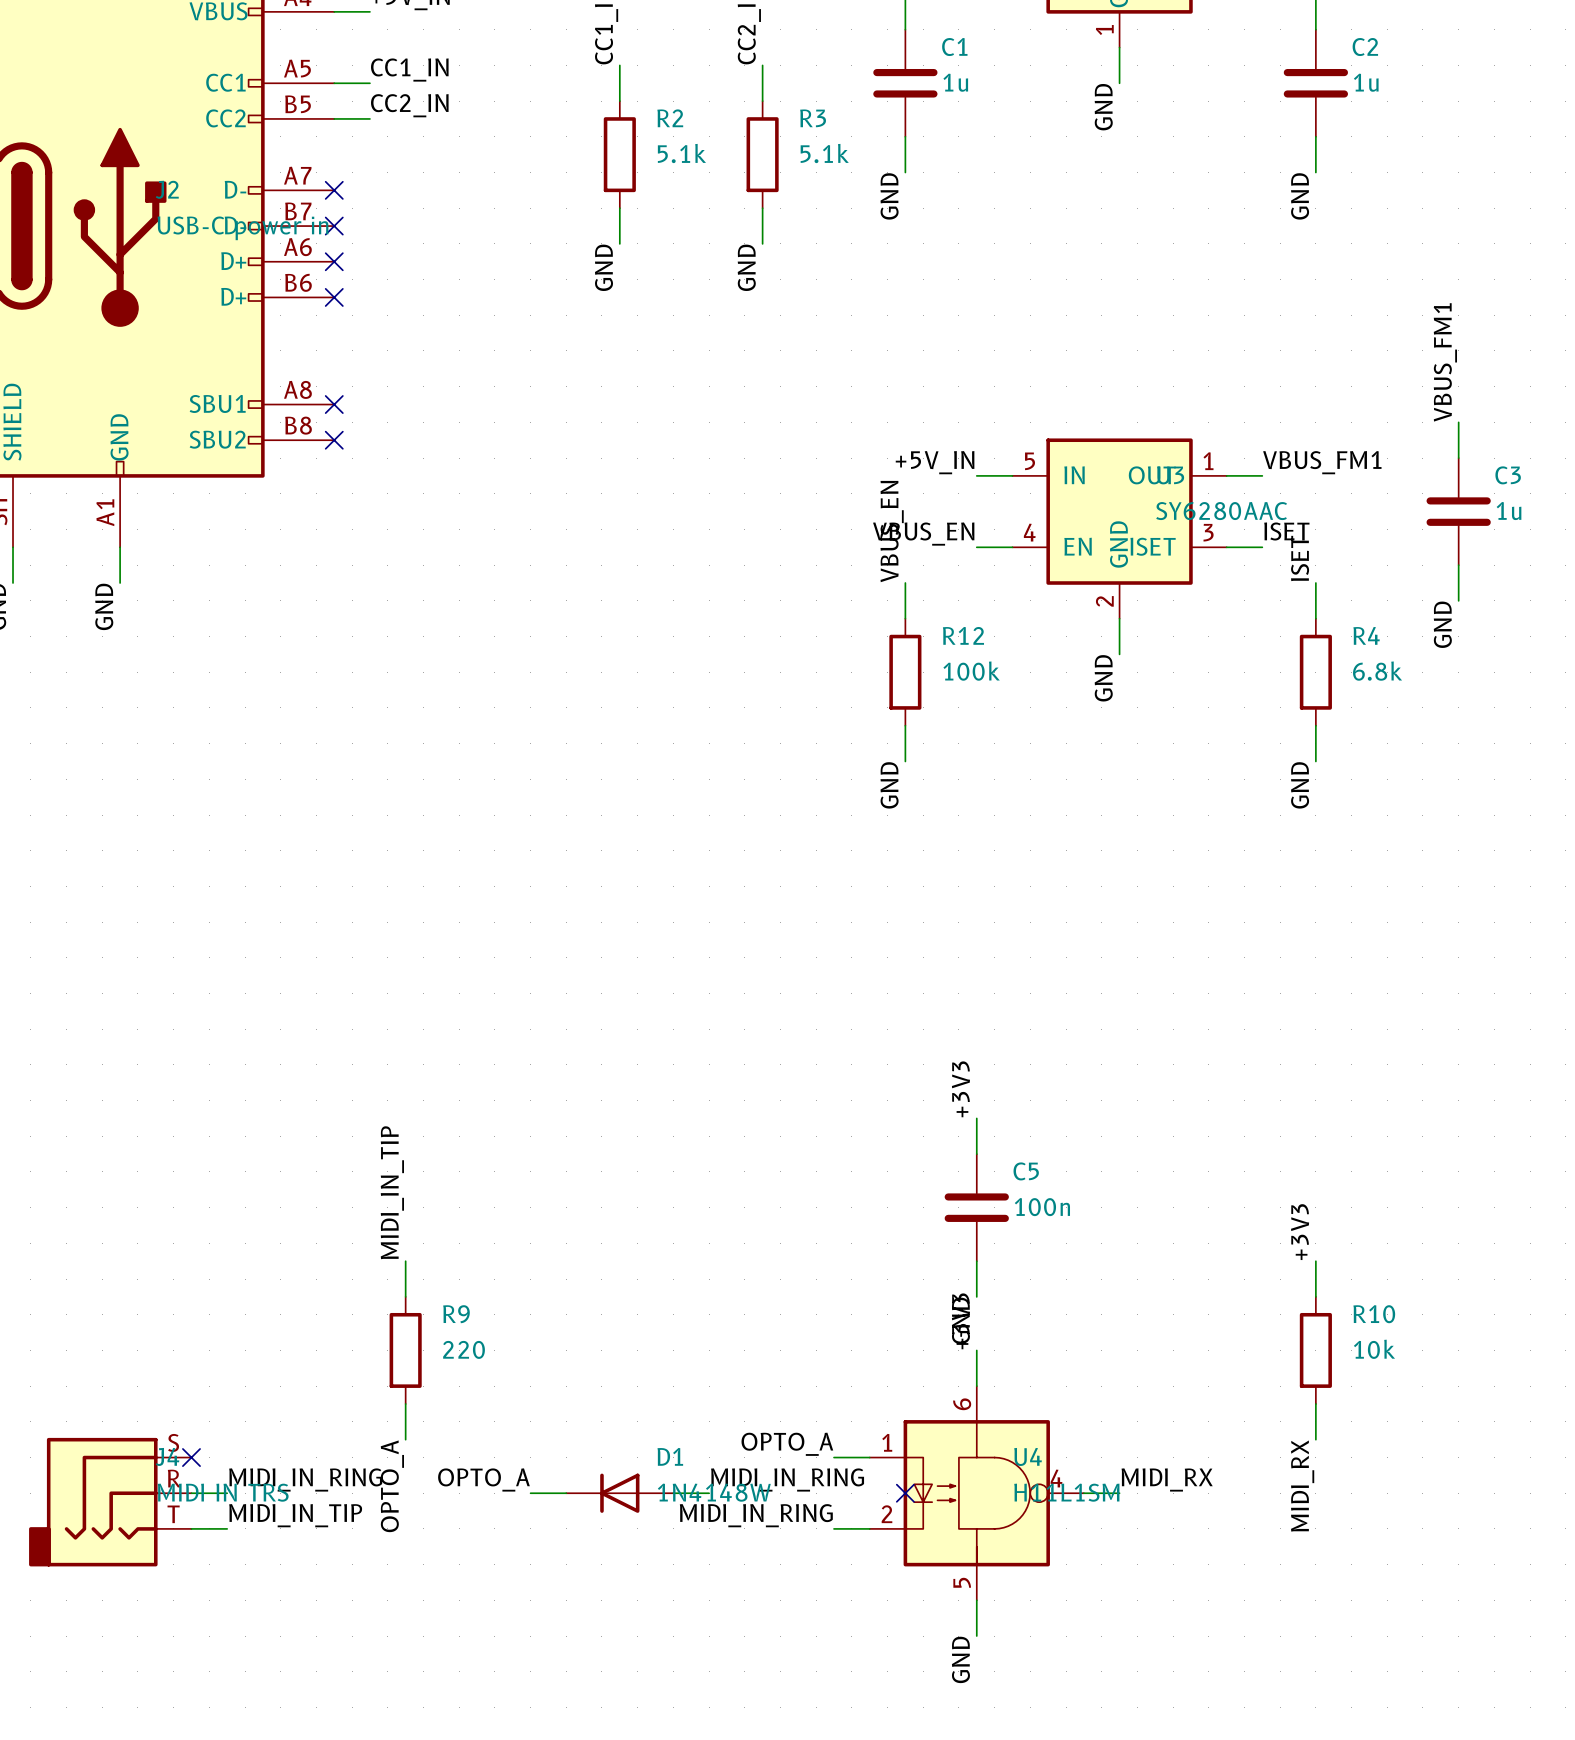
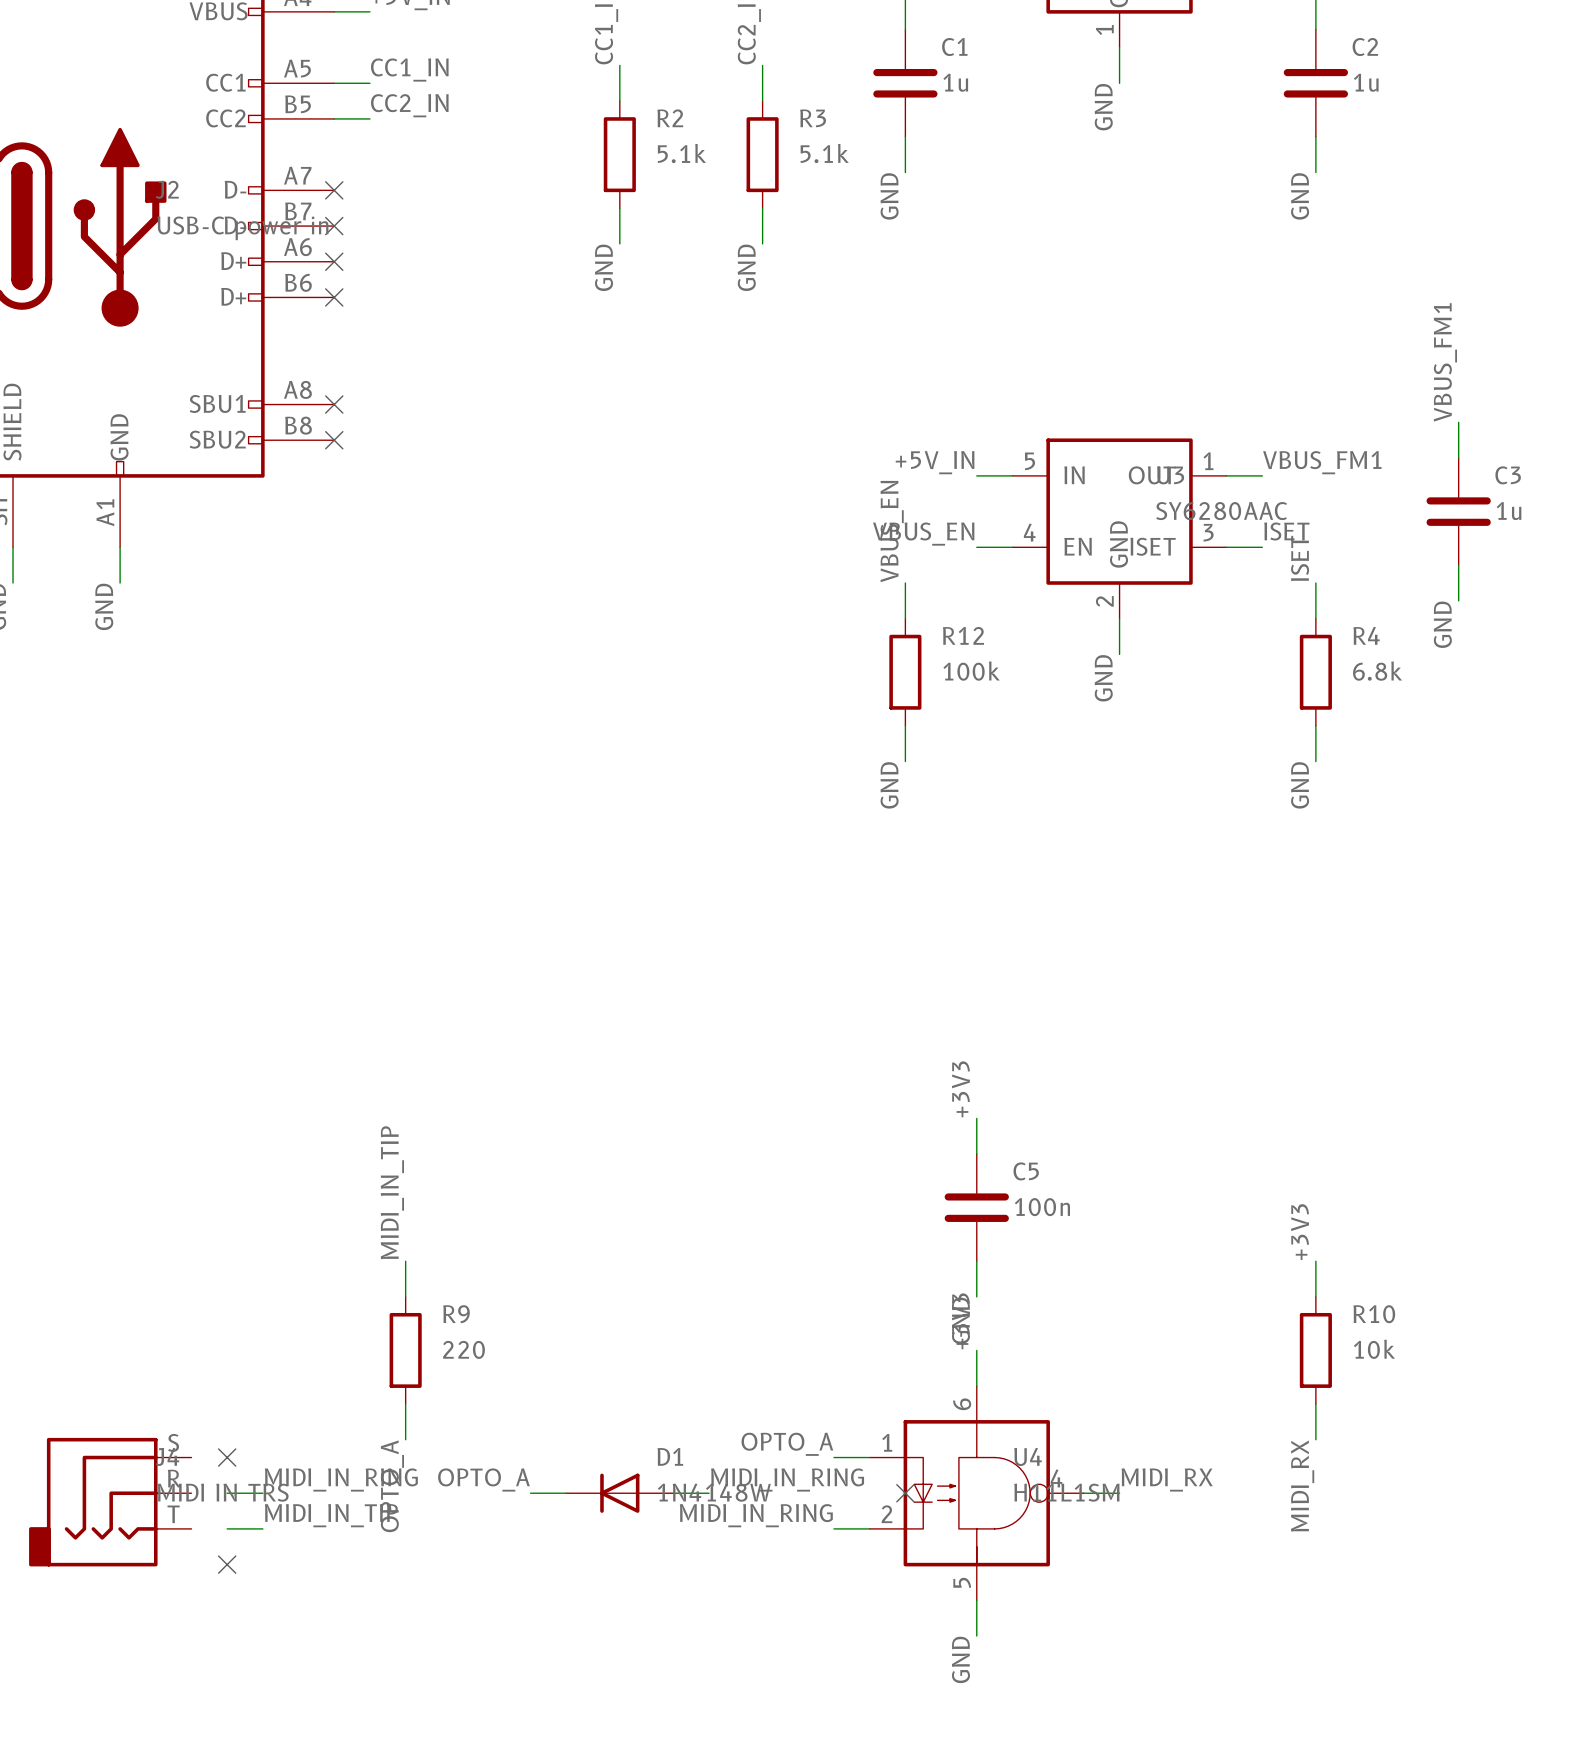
no-connect mark position: (191, 1457) -> (227, 1457)
label position: MIDI_IN_RING (305, 1479) -> MIDI_IN_RING (341, 1479)
wire: (191, 1493) (227, 1493) -> (262, 1493) (227, 1493)
label position: MIDI_IN_TIP (295, 1515) -> MIDI_IN_TIP (331, 1515)
wire: (191, 1528) (227, 1528) -> (262, 1528) (227, 1528)
no-connect mark: none -> (227, 1564)

